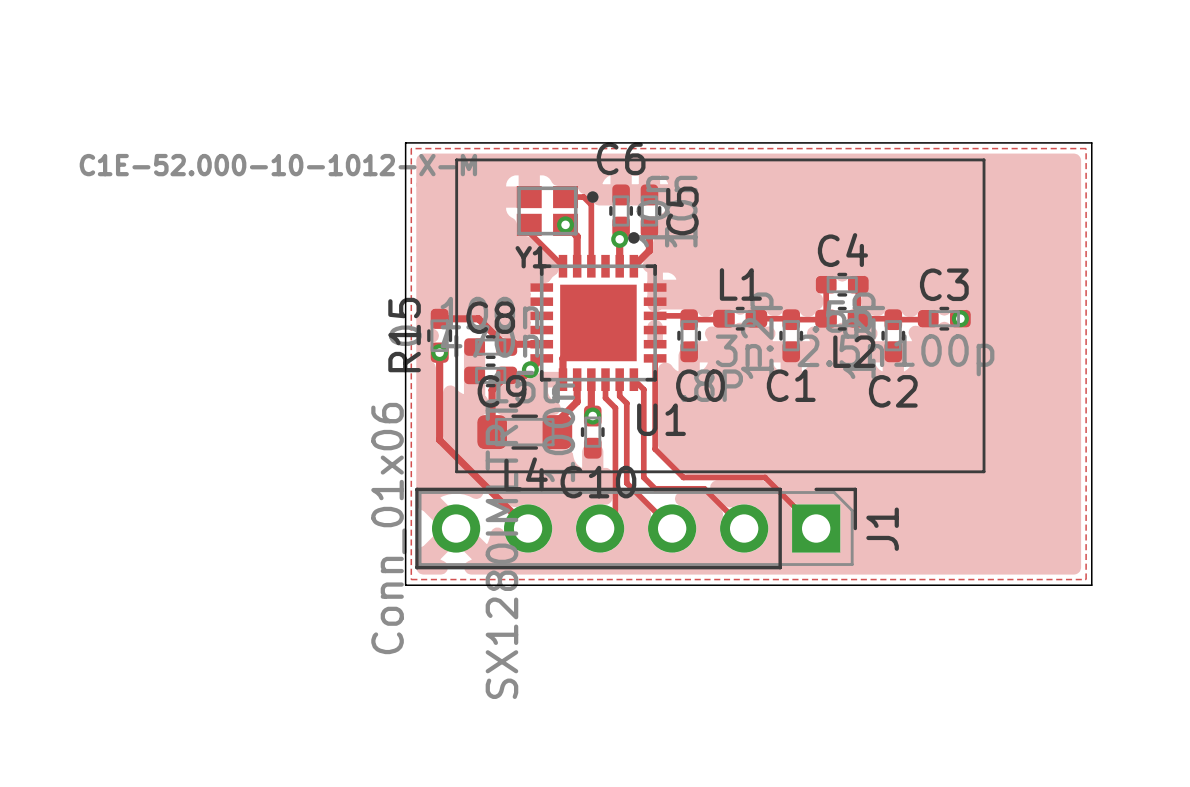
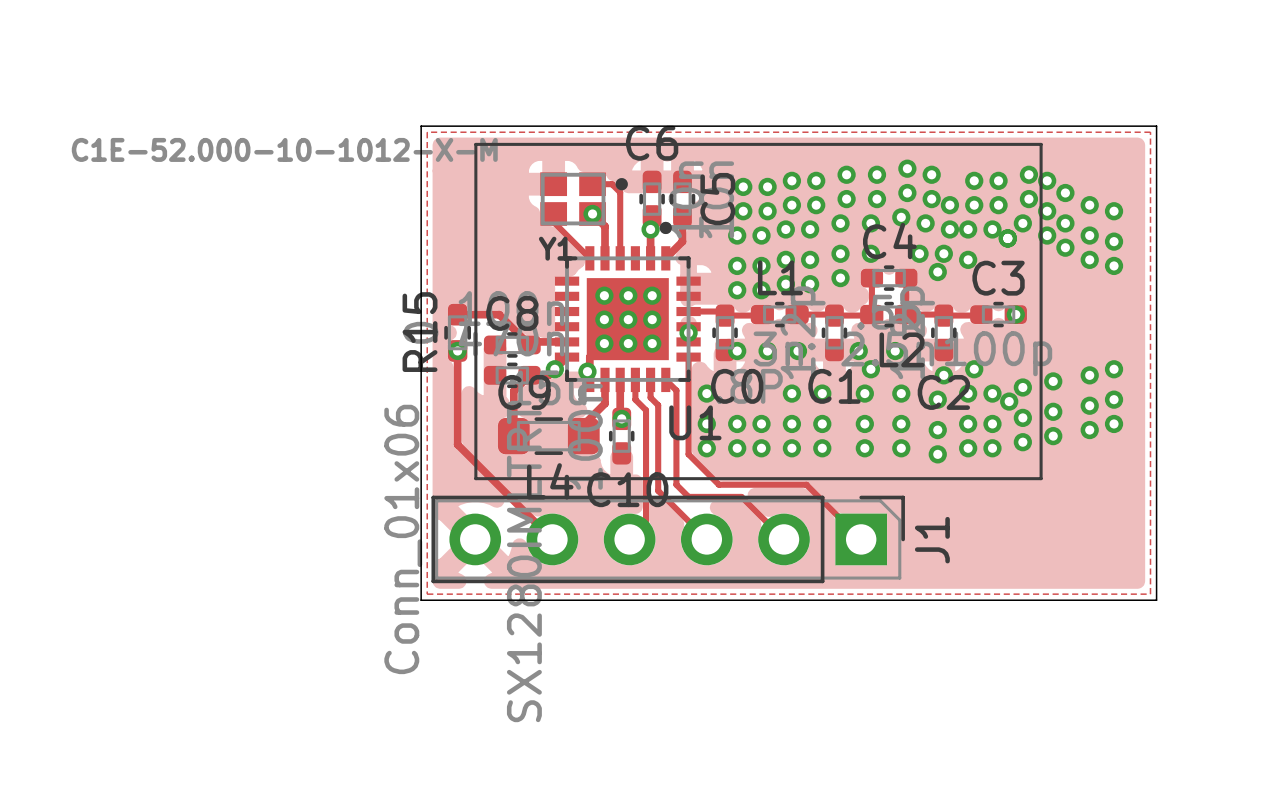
via: none -> (907, 168)
via: none -> (846, 174)
via: none -> (876, 174)
via: none -> (931, 174)
via: none -> (1028, 174)
via: none -> (791, 180)
via: none -> (816, 180)
via: none -> (974, 180)
via: none -> (998, 180)
via: none -> (1047, 180)
via: none -> (743, 186)
via: none -> (767, 186)
via: none -> (907, 193)
via: none -> (1065, 193)
via: none -> (846, 199)
via: none -> (876, 199)
via: none -> (931, 199)
via: none -> (1028, 199)
via: none -> (791, 205)
via: none -> (816, 205)
via: none -> (949, 205)
via: none -> (974, 205)
via: none -> (998, 205)
via: none -> (1089, 205)
via: none -> (743, 211)
via: none -> (767, 211)
via: none -> (1047, 211)
via: none -> (1114, 211)
via: none -> (901, 217)
via: none -> (840, 223)
via: none -> (870, 223)
via: none -> (925, 223)
via: none -> (1022, 223)
via: none -> (1065, 223)
via: none -> (785, 229)
via: none -> (810, 229)
via: none -> (949, 229)
via: none -> (968, 229)
via: none -> (992, 229)
via: none -> (737, 235)
via: none -> (761, 235)
via: none -> (1047, 235)
via: none -> (1089, 235)
via: none -> (1007, 238)
via: none -> (1114, 241)
via: none -> (1065, 247)
via: none -> (840, 253)
via: none -> (870, 253)
via: none -> (919, 253)
via: none -> (943, 253)
via: none -> (785, 259)
via: none -> (810, 259)
via: none -> (968, 259)
via: none -> (1089, 259)
via: none -> (737, 265)
via: none -> (761, 265)
via: none -> (1114, 265)
via: none -> (937, 272)
via: none -> (840, 278)
via: none -> (785, 284)
via: none -> (810, 284)
via: none -> (737, 290)
via: none -> (761, 290)
via: none -> (604, 295)
via: none -> (628, 295)
via: none -> (652, 295)
via: none -> (604, 319)
via: none -> (628, 319)
via: none -> (652, 319)
via: none -> (688, 332)
via: none -> (604, 343)
via: none -> (628, 343)
via: none -> (652, 343)
via: none -> (737, 351)
via: none -> (767, 351)
via: none -> (797, 351)
via: none -> (858, 351)
via: none -> (895, 351)
via: none -> (870, 369)
via: none -> (974, 369)
via: none -> (1114, 369)
via: none -> (587, 371)
via: none -> (943, 375)
via: none -> (1089, 375)
via: none -> (1053, 381)
via: none -> (1022, 387)
via: none -> (706, 393)
via: none -> (791, 393)
via: none -> (822, 393)
via: none -> (864, 393)
via: none -> (901, 393)
via: none -> (968, 393)
via: none -> (992, 393)
via: none -> (937, 399)
via: none -> (1114, 399)
via: none -> (1009, 401)
via: none -> (1089, 405)
via: none -> (1053, 411)
via: none -> (1022, 417)
via: none -> (706, 423)
via: none -> (737, 423)
via: none -> (761, 423)
via: none -> (791, 423)
via: none -> (822, 423)
via: none -> (864, 423)
via: none -> (901, 423)
via: none -> (968, 423)
via: none -> (992, 423)
via: none -> (1114, 423)
via: none -> (937, 430)
via: none -> (1089, 430)
via: none -> (1053, 436)
via: none -> (1022, 442)
via: none -> (706, 448)
via: none -> (737, 448)
via: none -> (761, 448)
via: none -> (791, 448)
via: none -> (822, 448)
via: none -> (864, 448)
via: none -> (901, 448)
via: none -> (968, 448)
via: none -> (992, 448)
via: none -> (937, 454)

